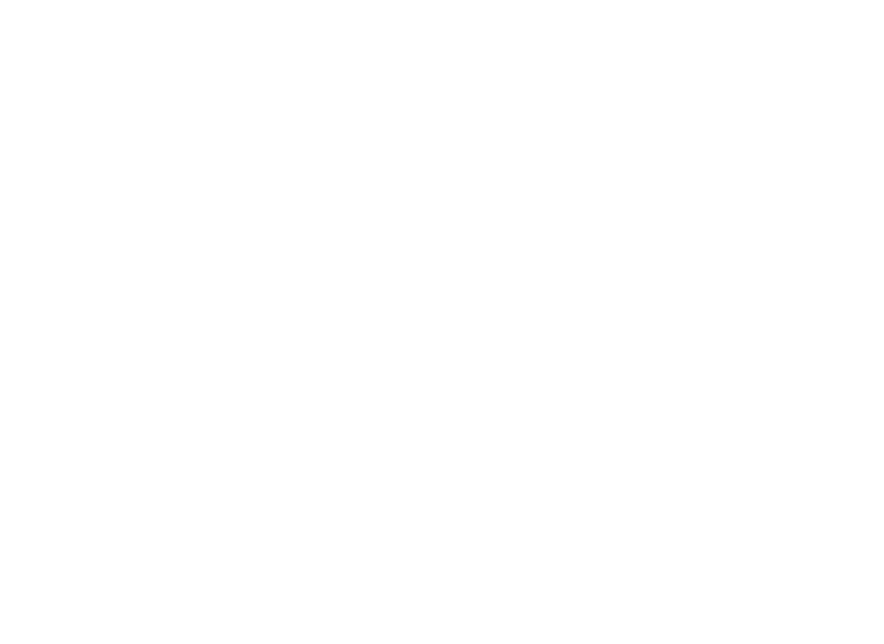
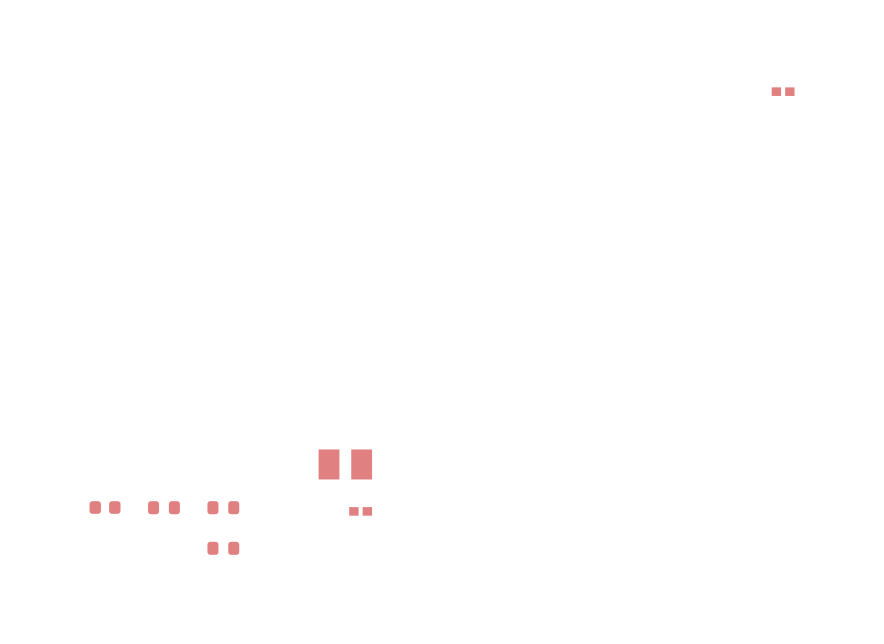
part: none -> (783, 91)
part: none -> (345, 464)
part: none -> (105, 507)
part: none -> (163, 507)
part: none -> (223, 507)
part: none -> (360, 511)
part: none -> (223, 548)

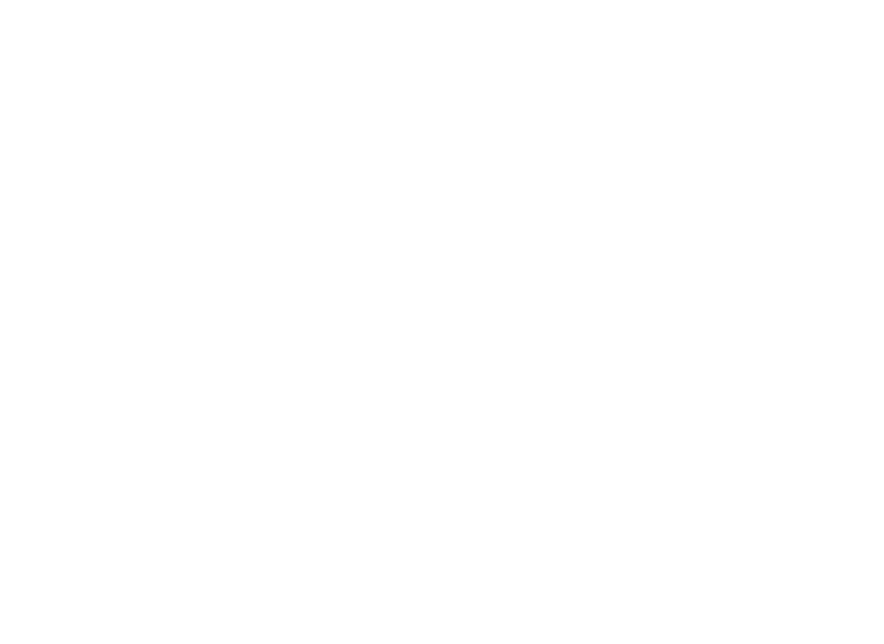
part: (783, 91) -> none
part: (345, 464) -> none
part: (105, 507) -> none
part: (163, 507) -> none
part: (223, 507) -> none
part: (360, 511) -> none
part: (223, 548) -> none

